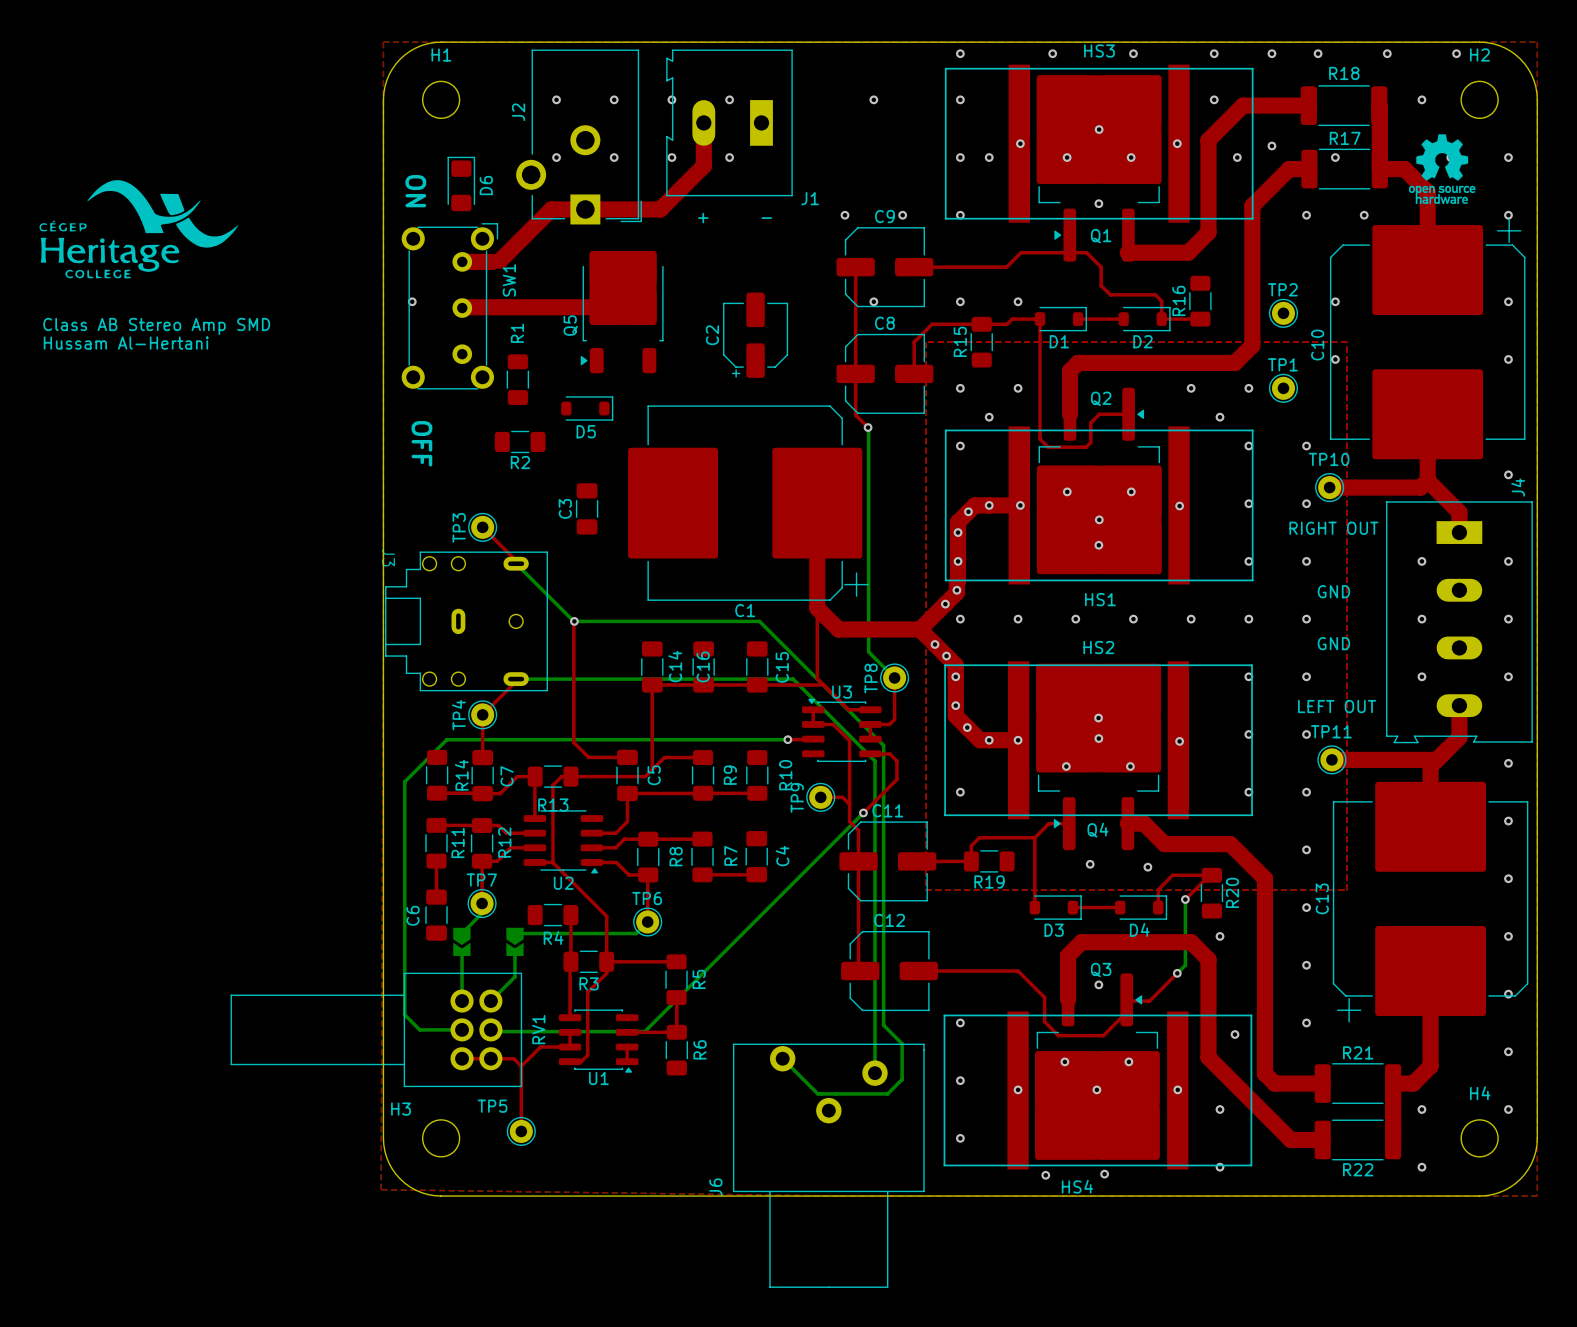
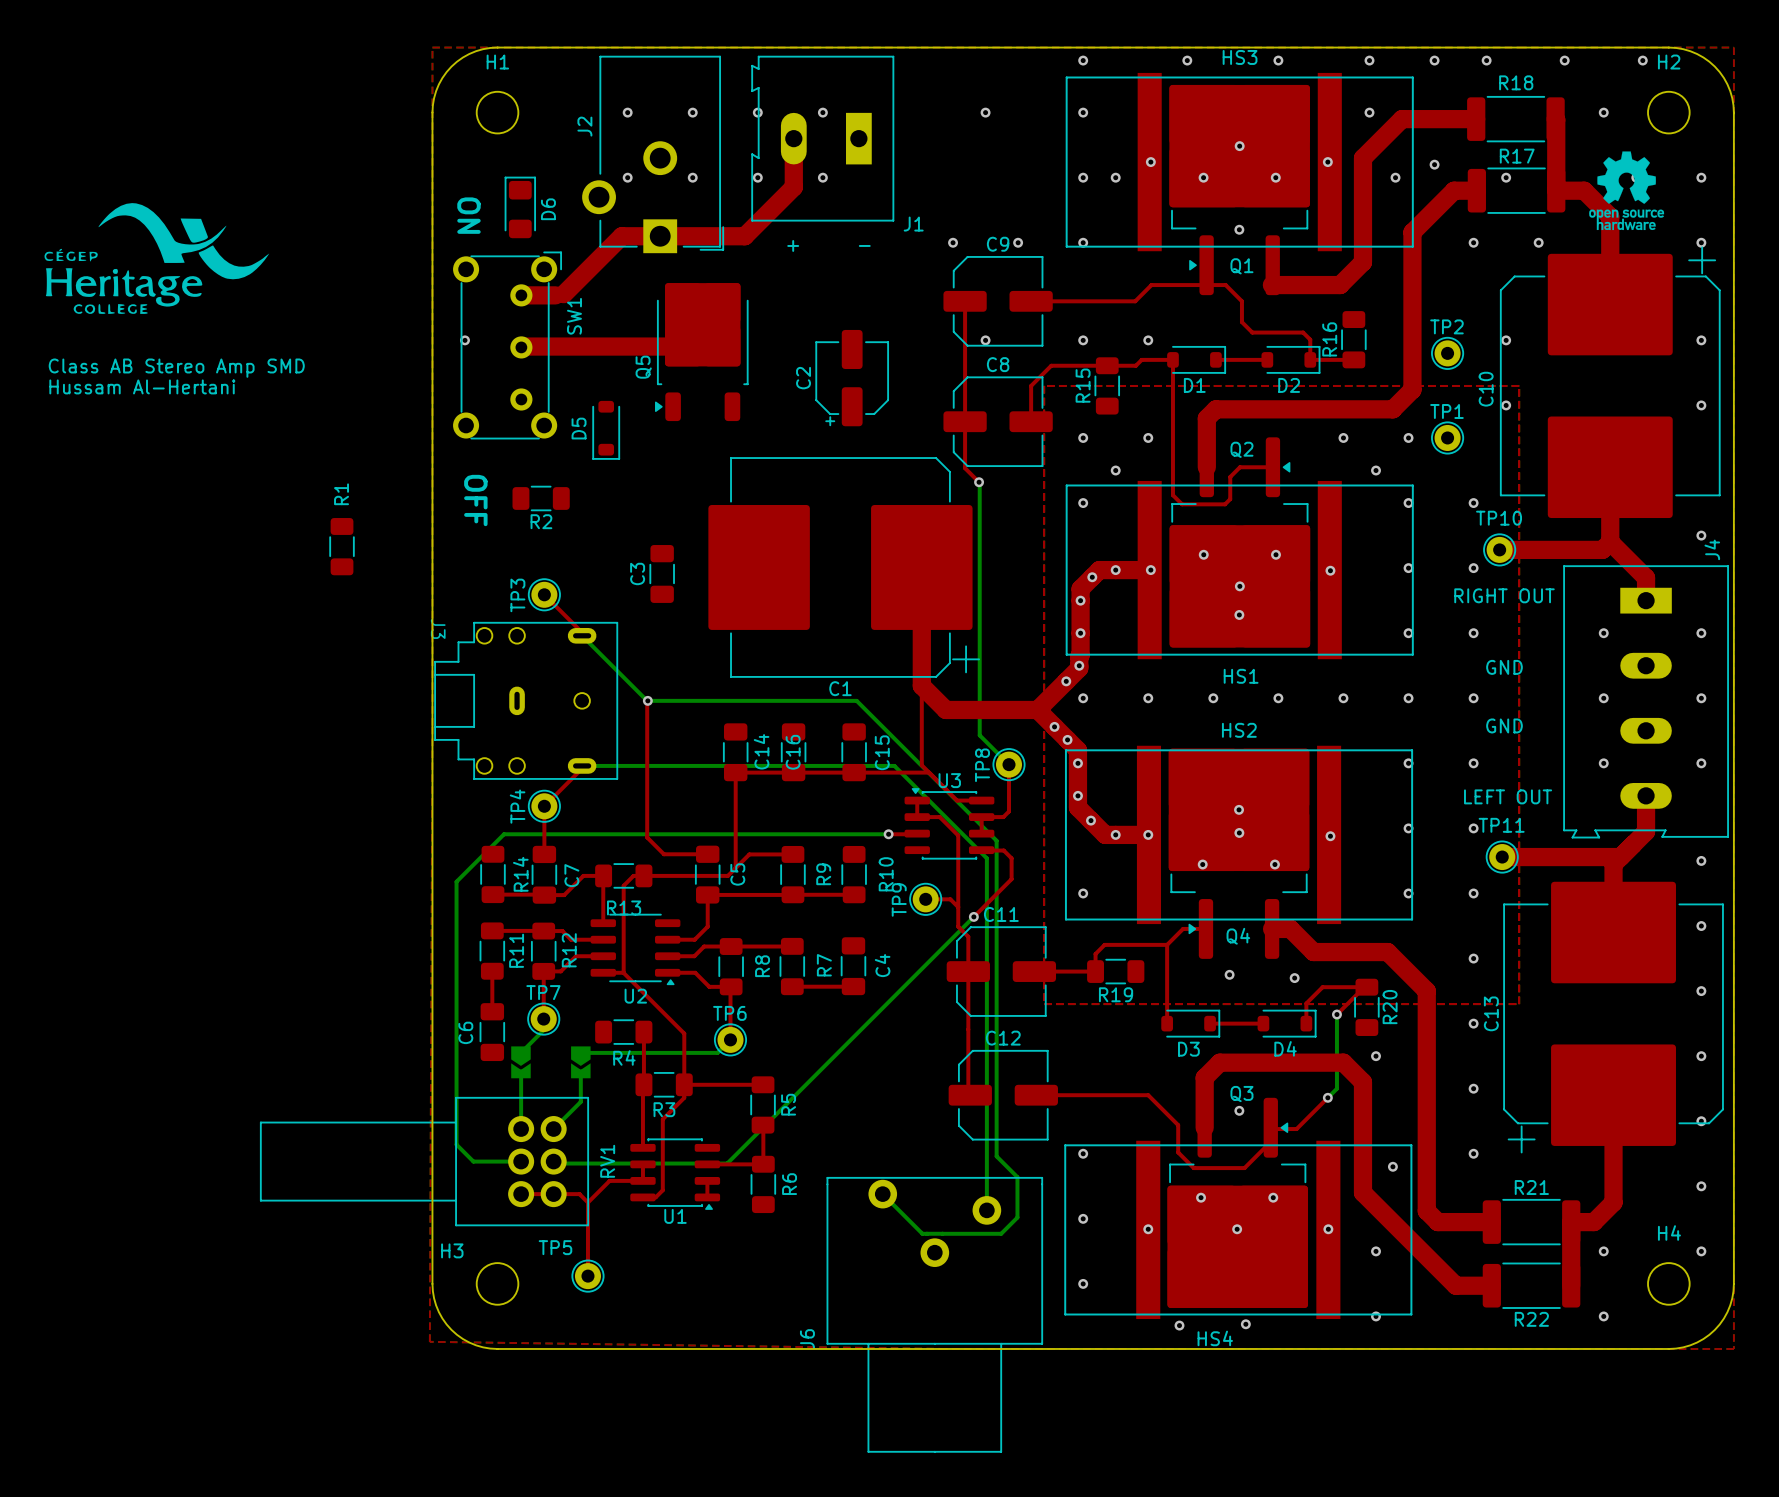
R1 position: (517, 379) -> (342, 546)
D5 rotation: 0° (587, 408) -> 90° clockwise (606, 430)
D5 position: (587, 408) -> (606, 430)
R2 position: (520, 441) -> (541, 498)

